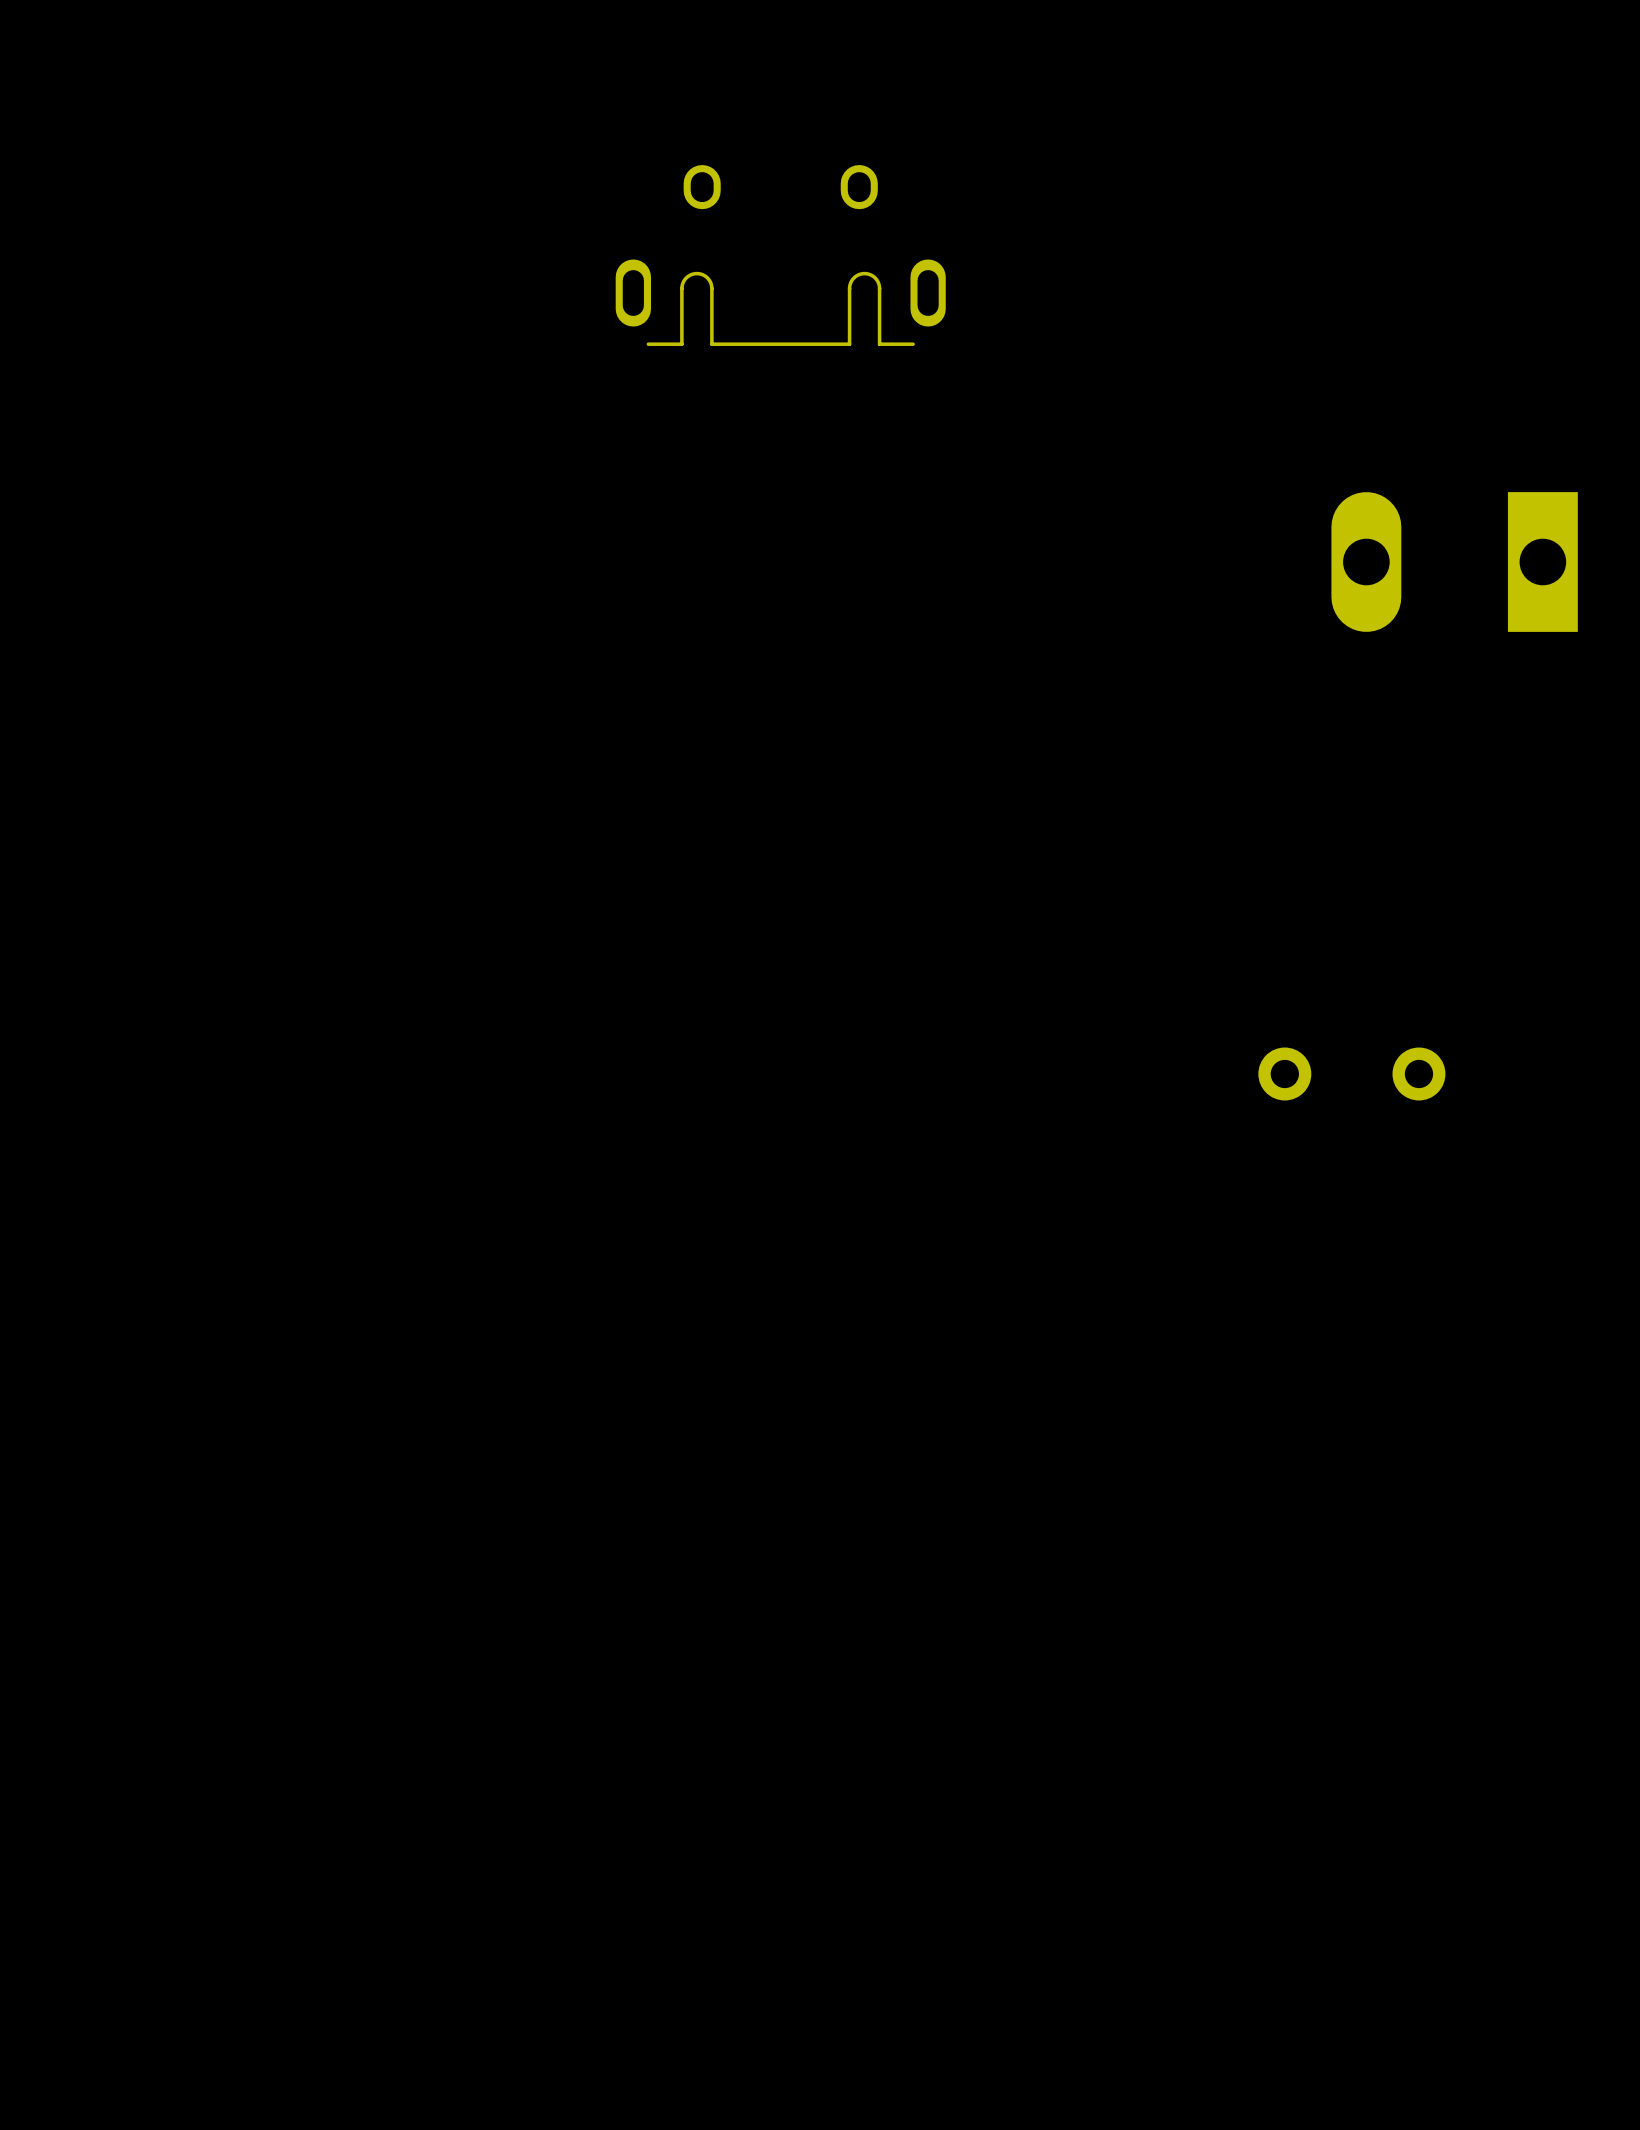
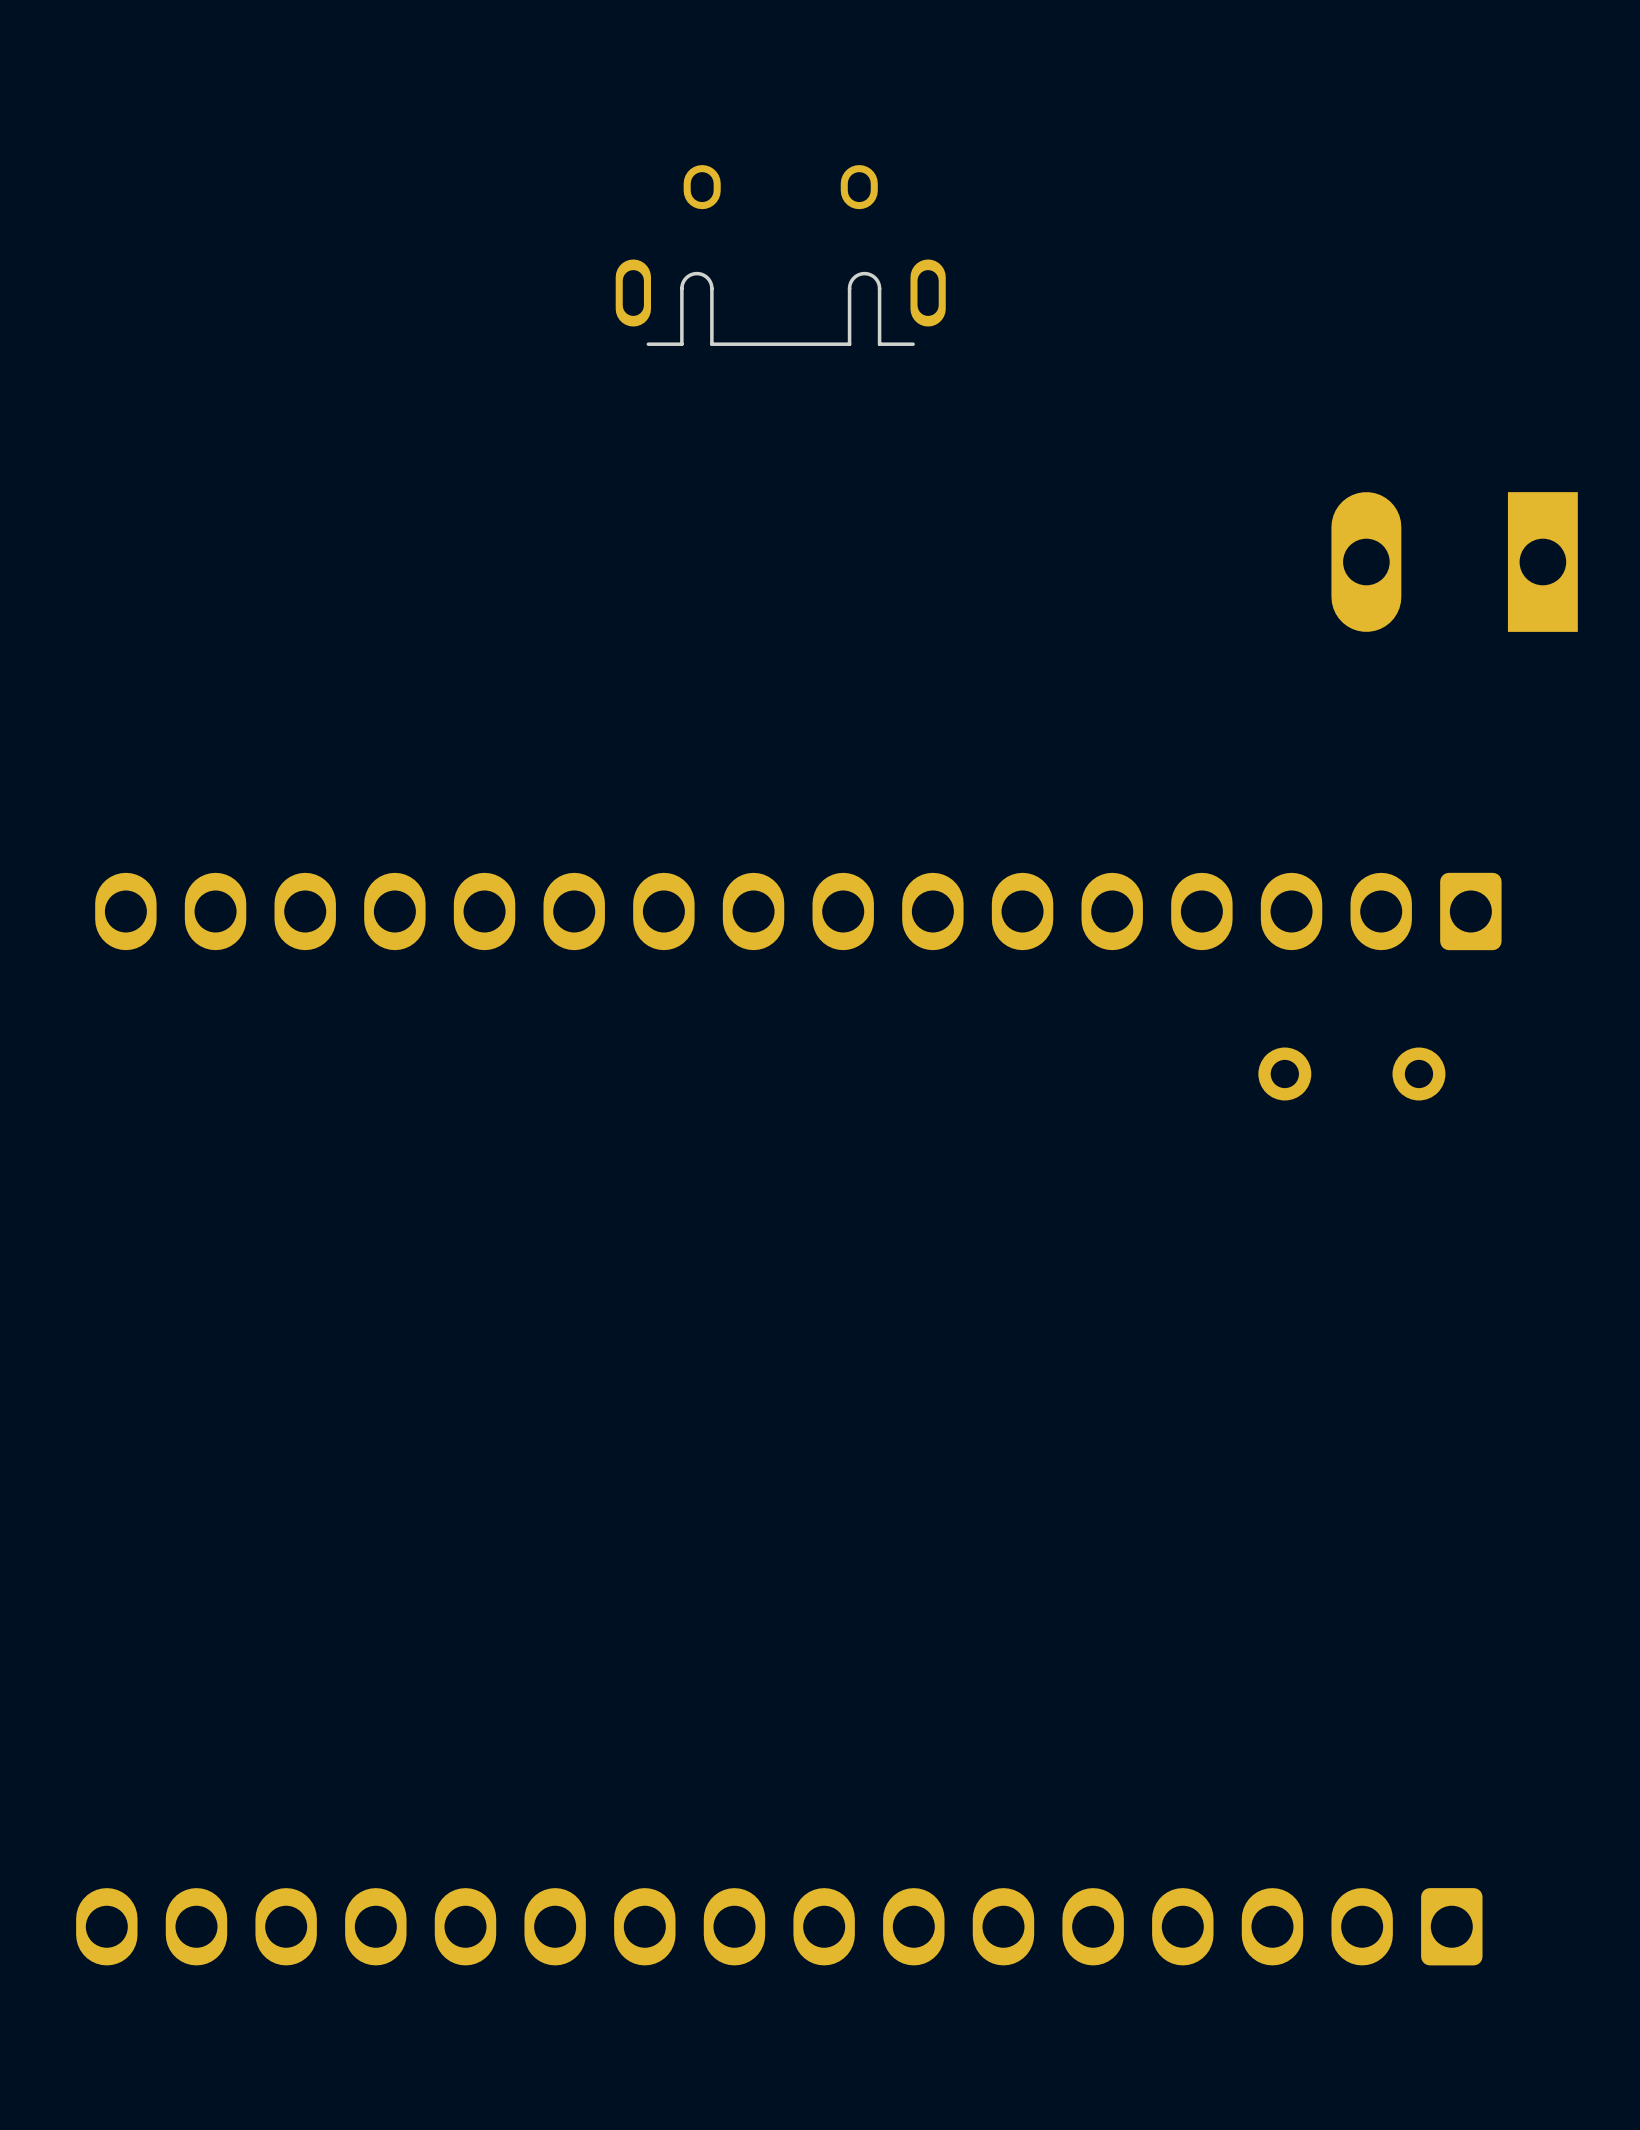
part: none -> (798, 911)
part: none -> (779, 1926)

